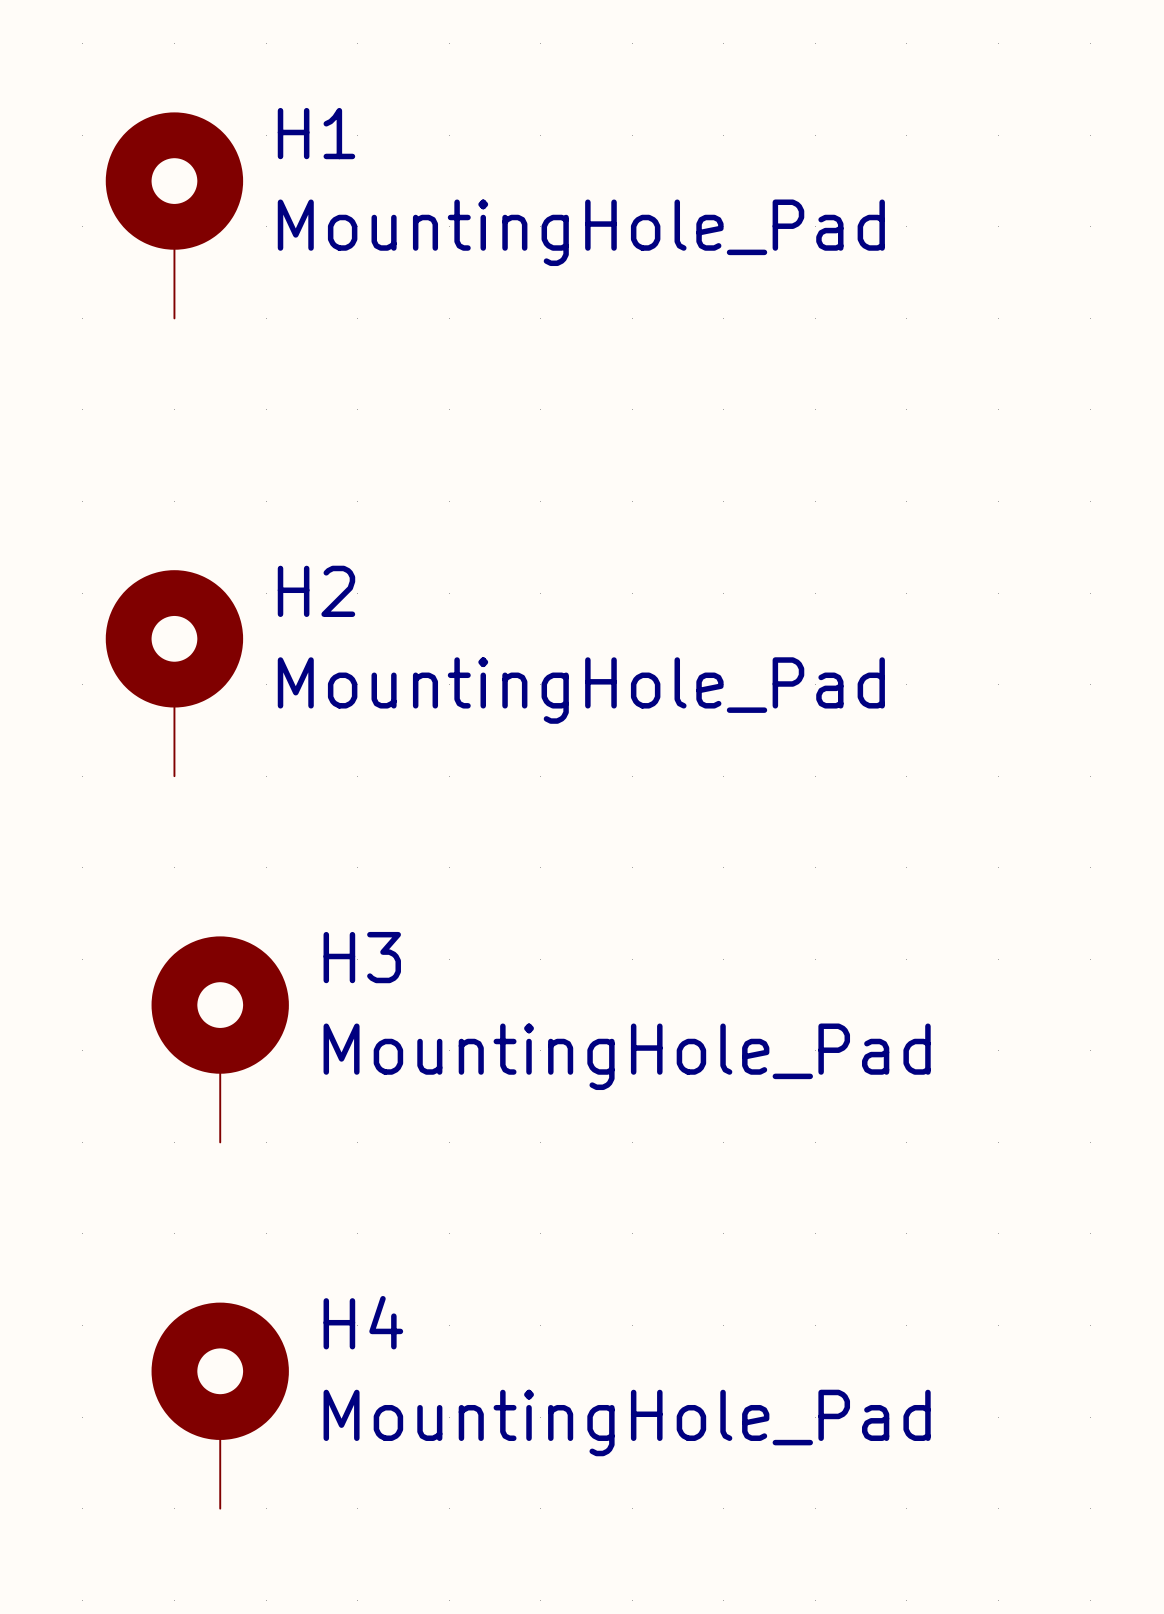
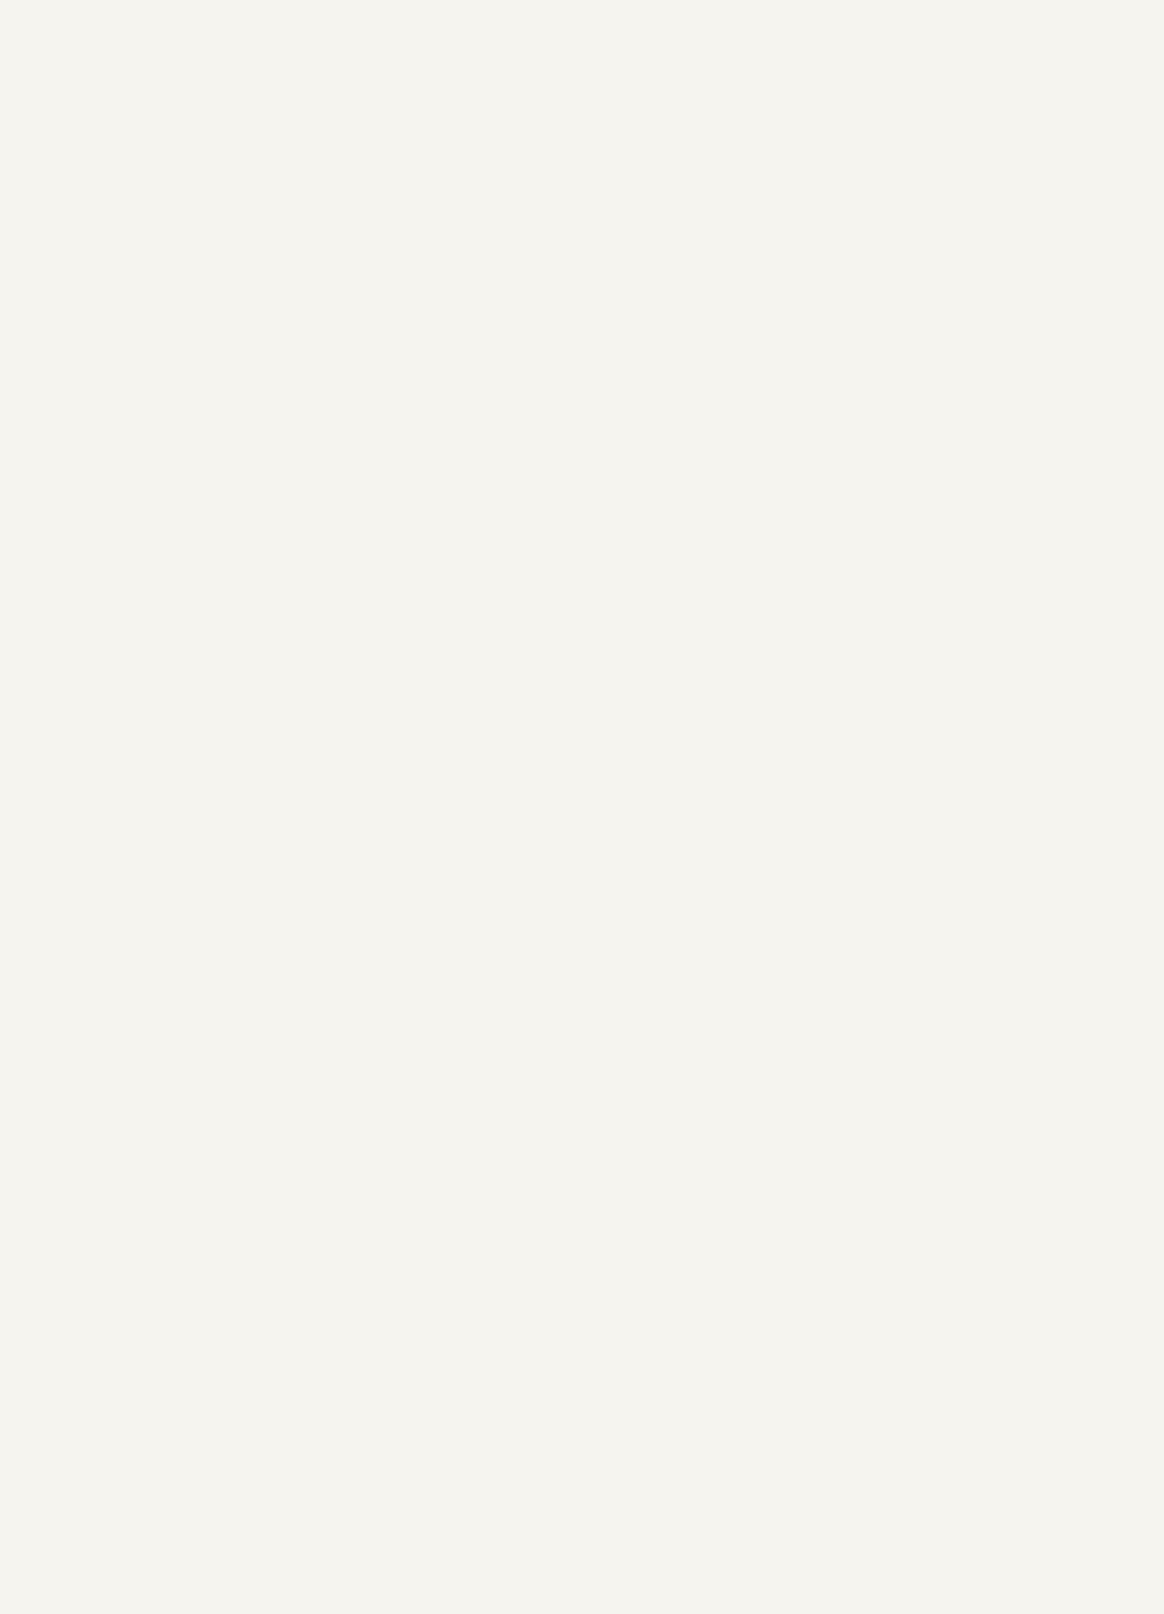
H1: MountingHole_Pad (174, 215) -> none
H2: MountingHole_Pad (174, 673) -> none
H3: MountingHole_Pad (220, 1039) -> none
H4: MountingHole_Pad (220, 1405) -> none

